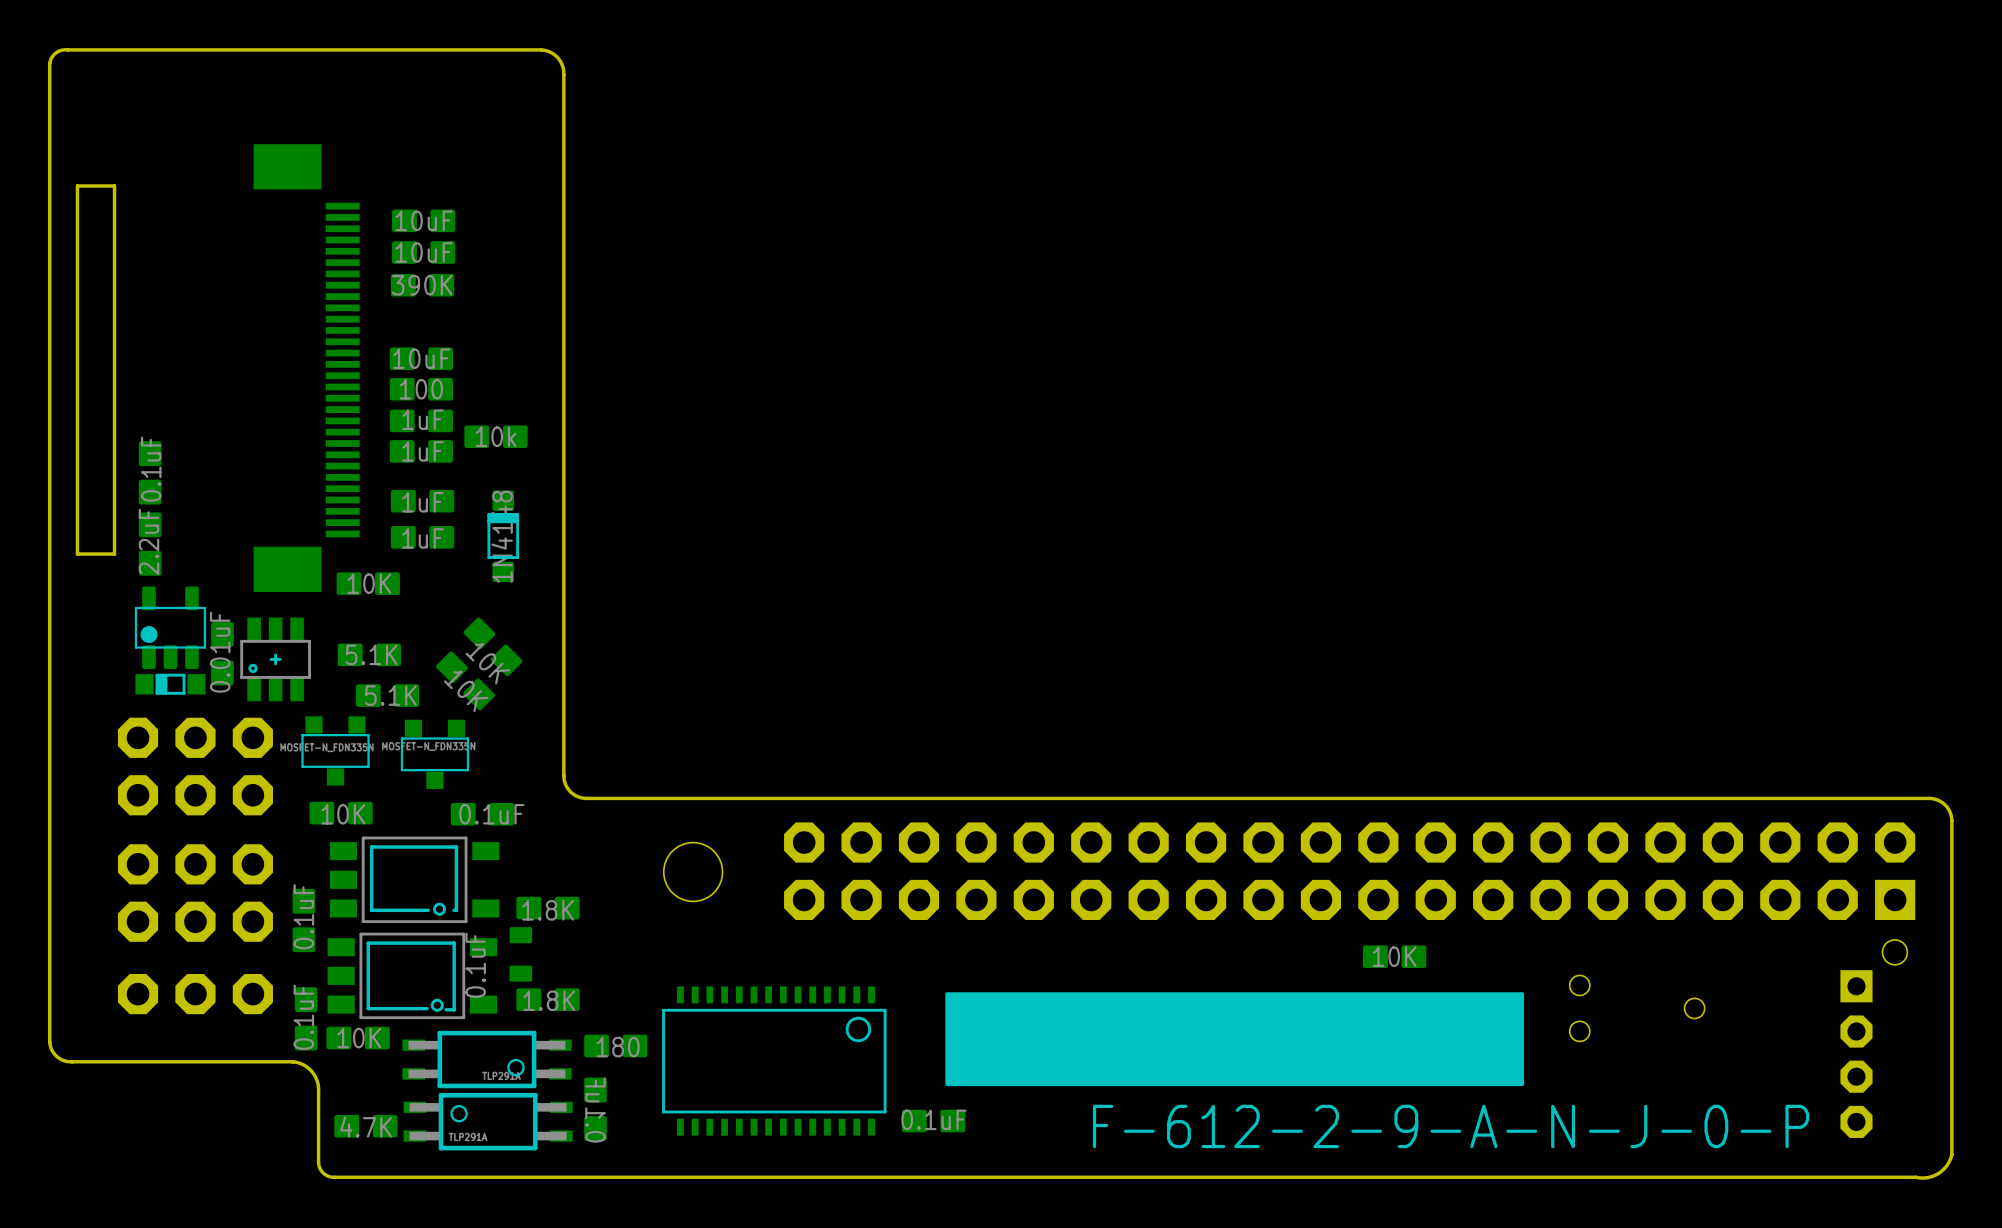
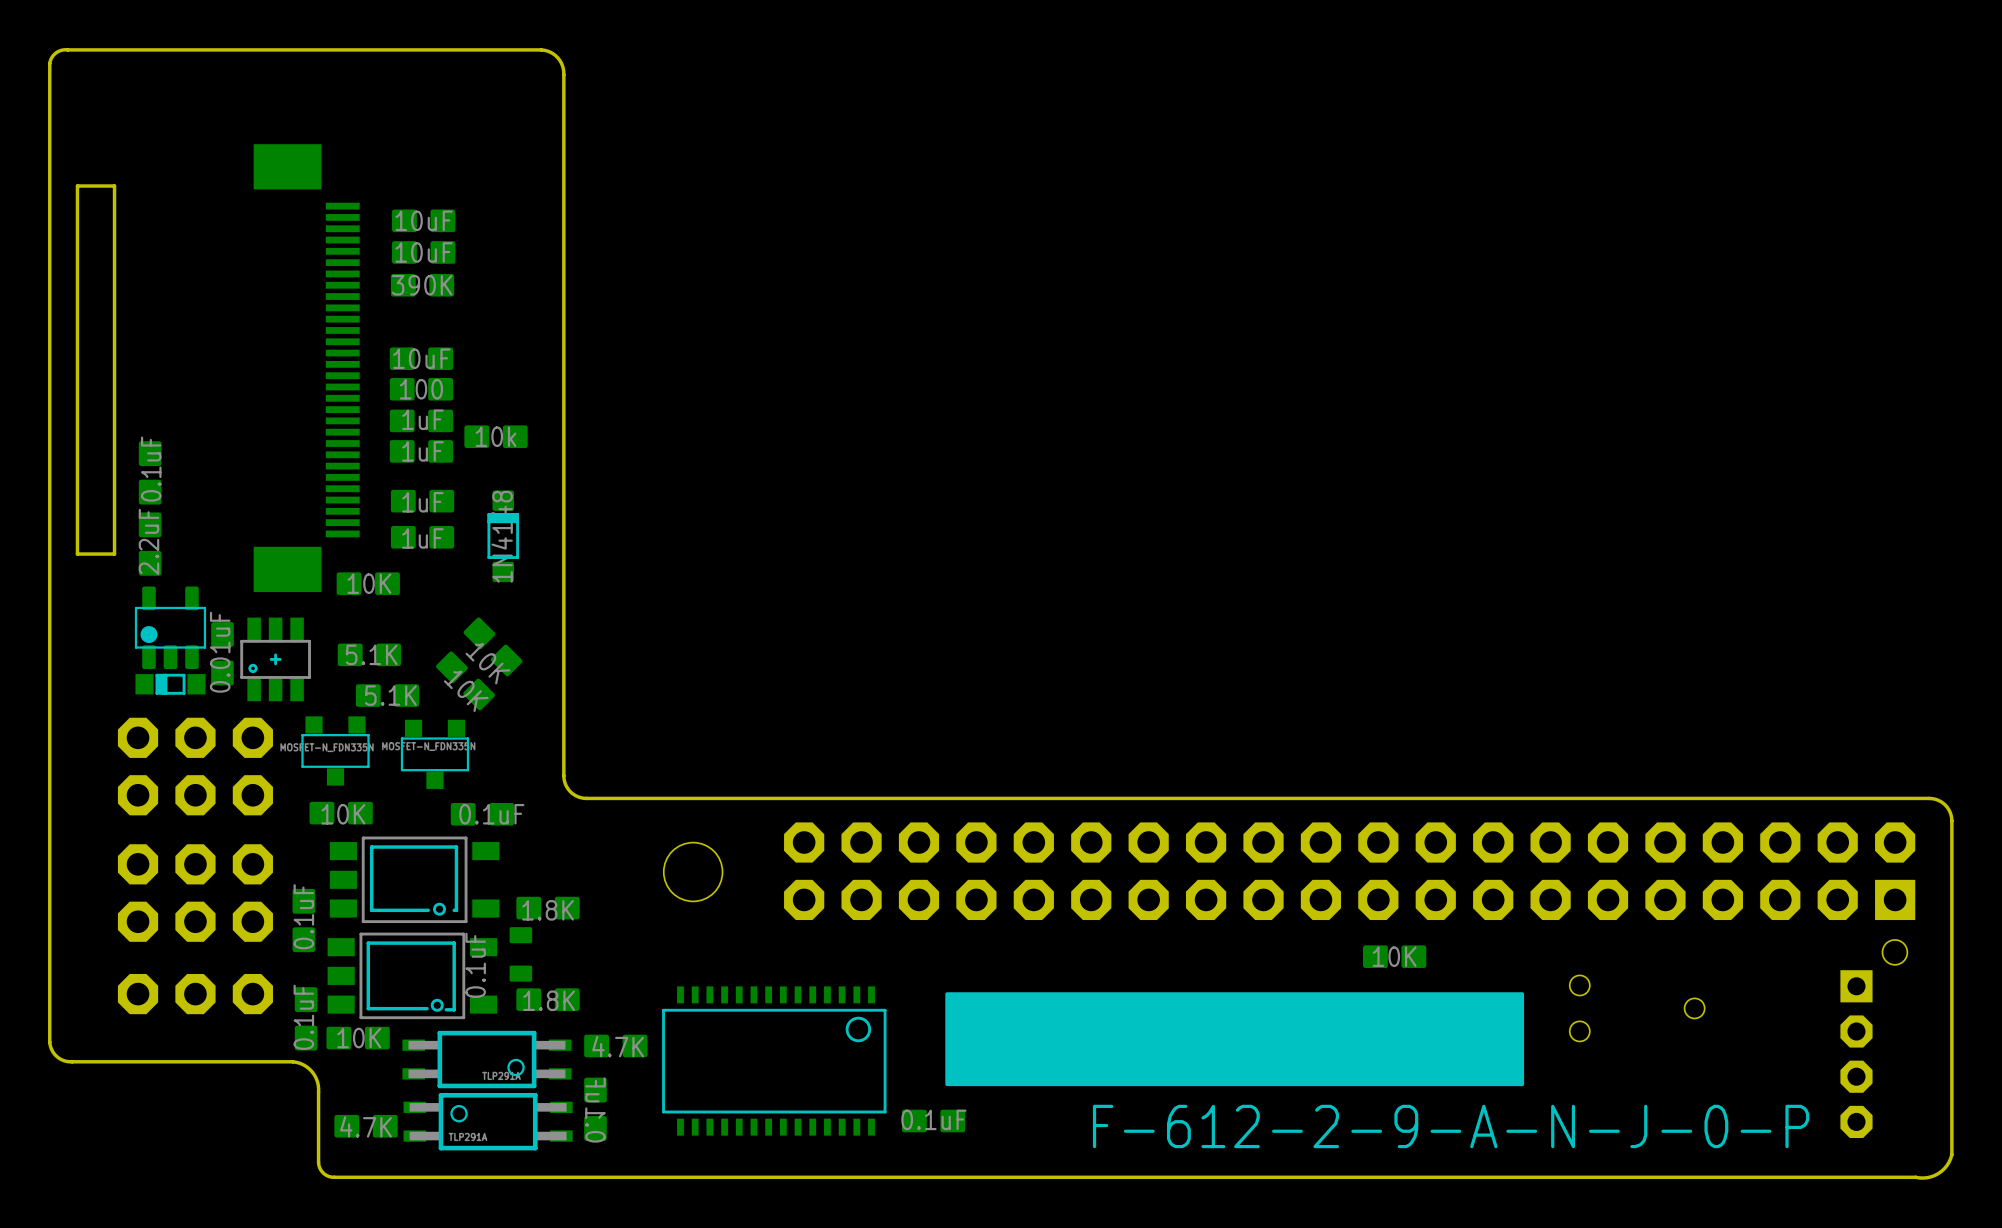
part value: 180 (618, 1047) -> 4.7K (618, 1046)

